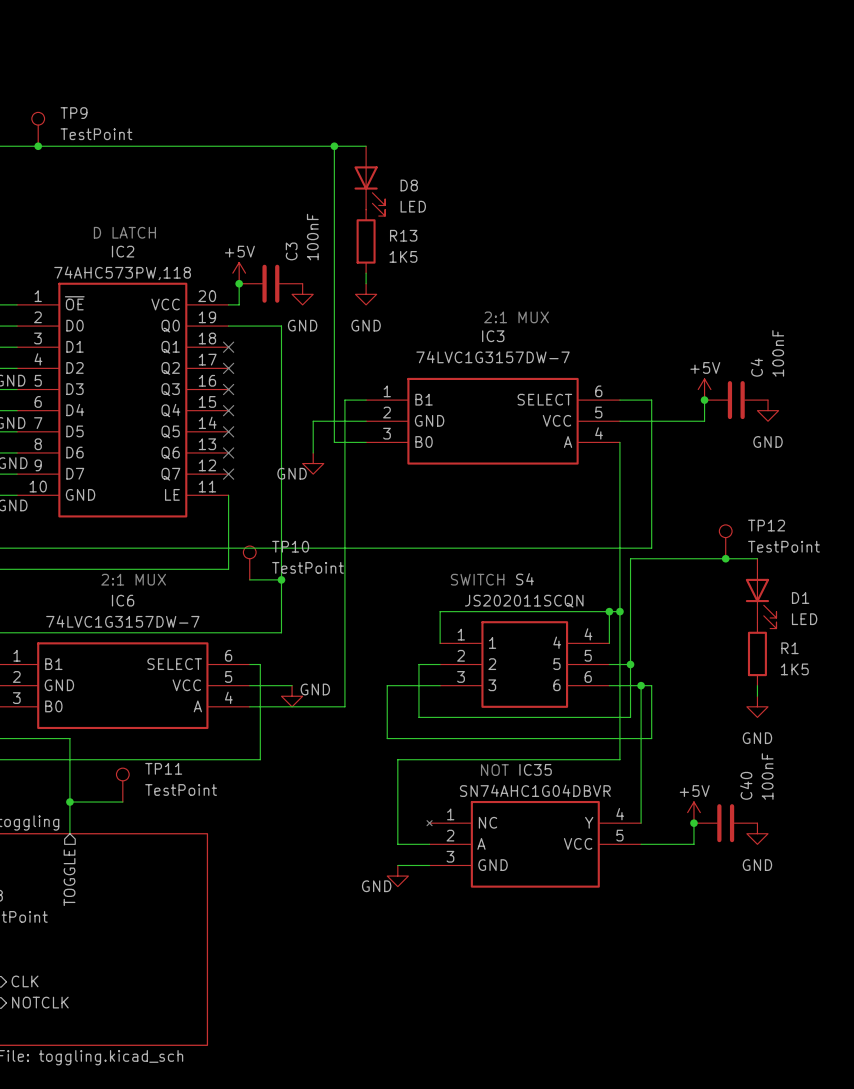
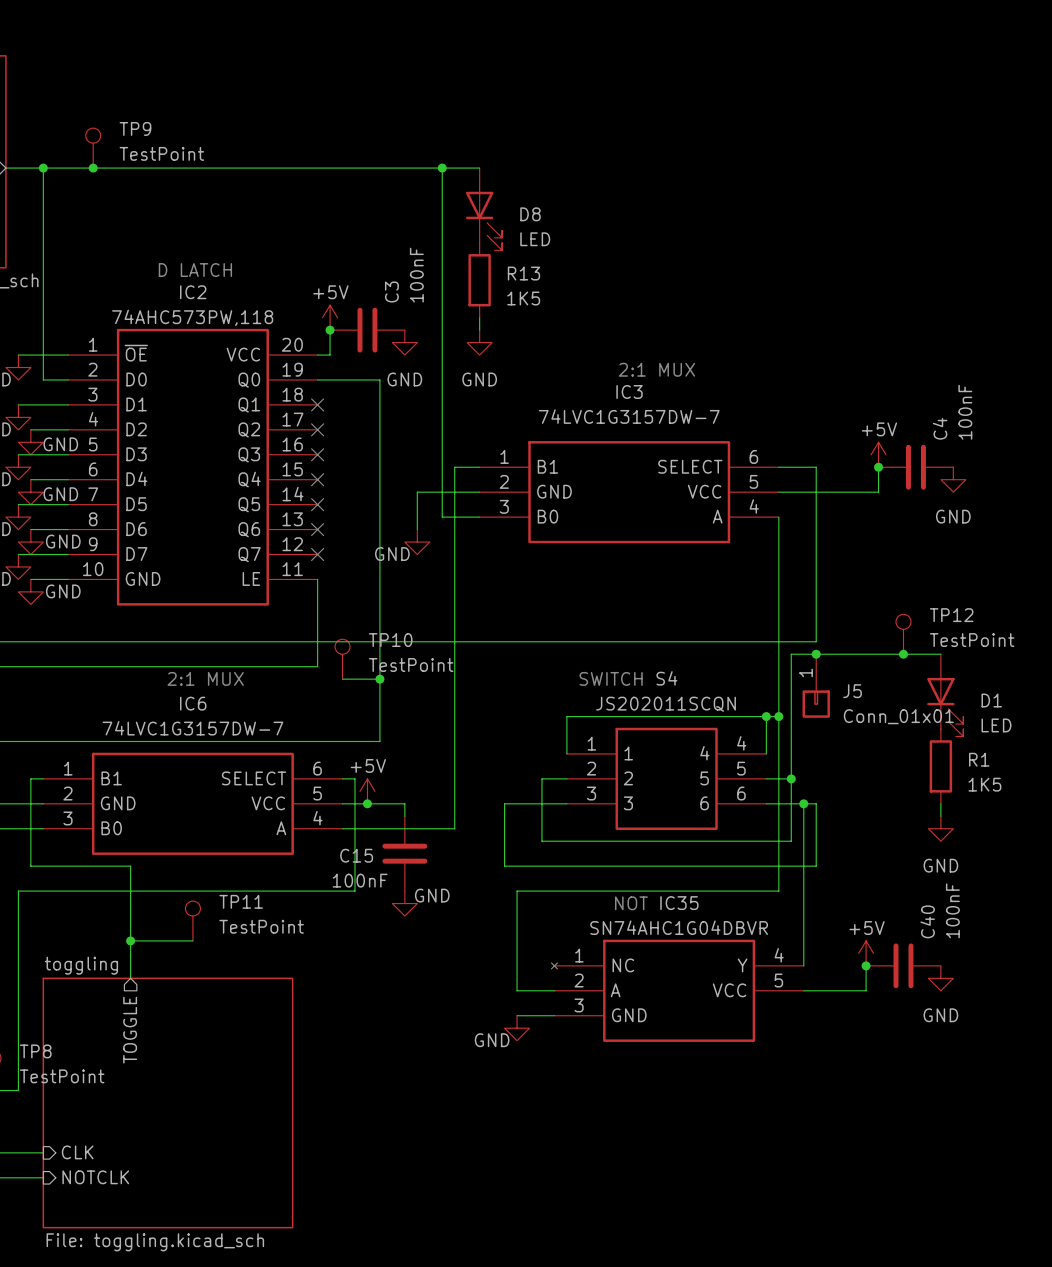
junction: none -> (816, 654)
J5: none -> Conn_01x01 (816, 686)
power symbol: none -> +5V (367, 791)
junction: none -> (367, 803)
wire: none -> (392, 803) (404, 803) (404, 816)
power symbol position: GND (292, 696) -> GND (404, 903)
C15: none -> 100nF (404, 853)

